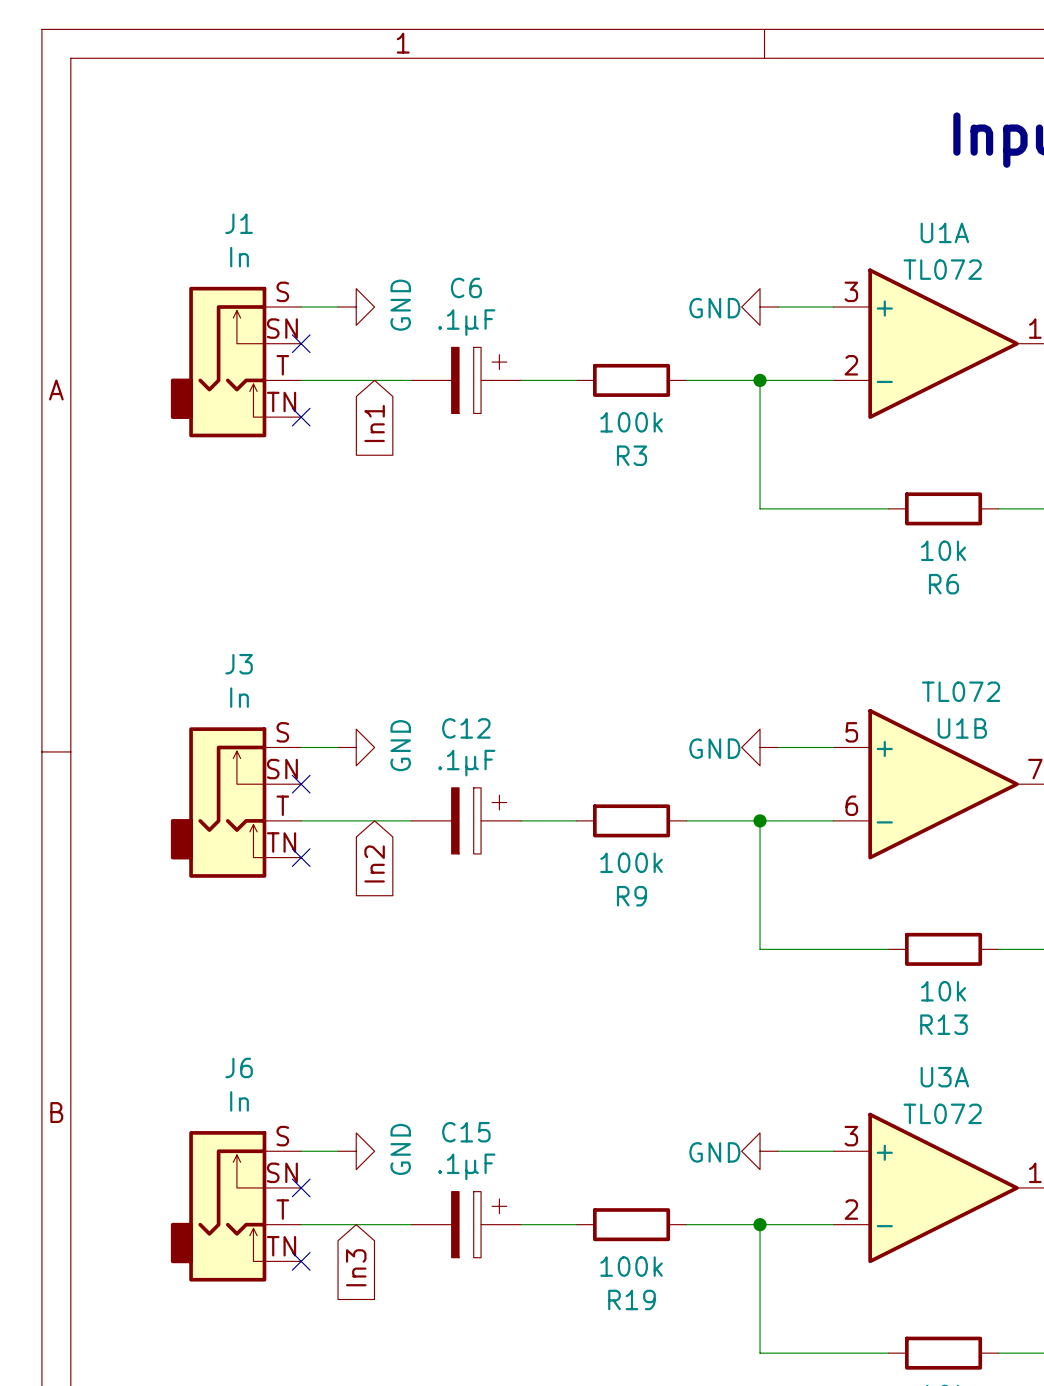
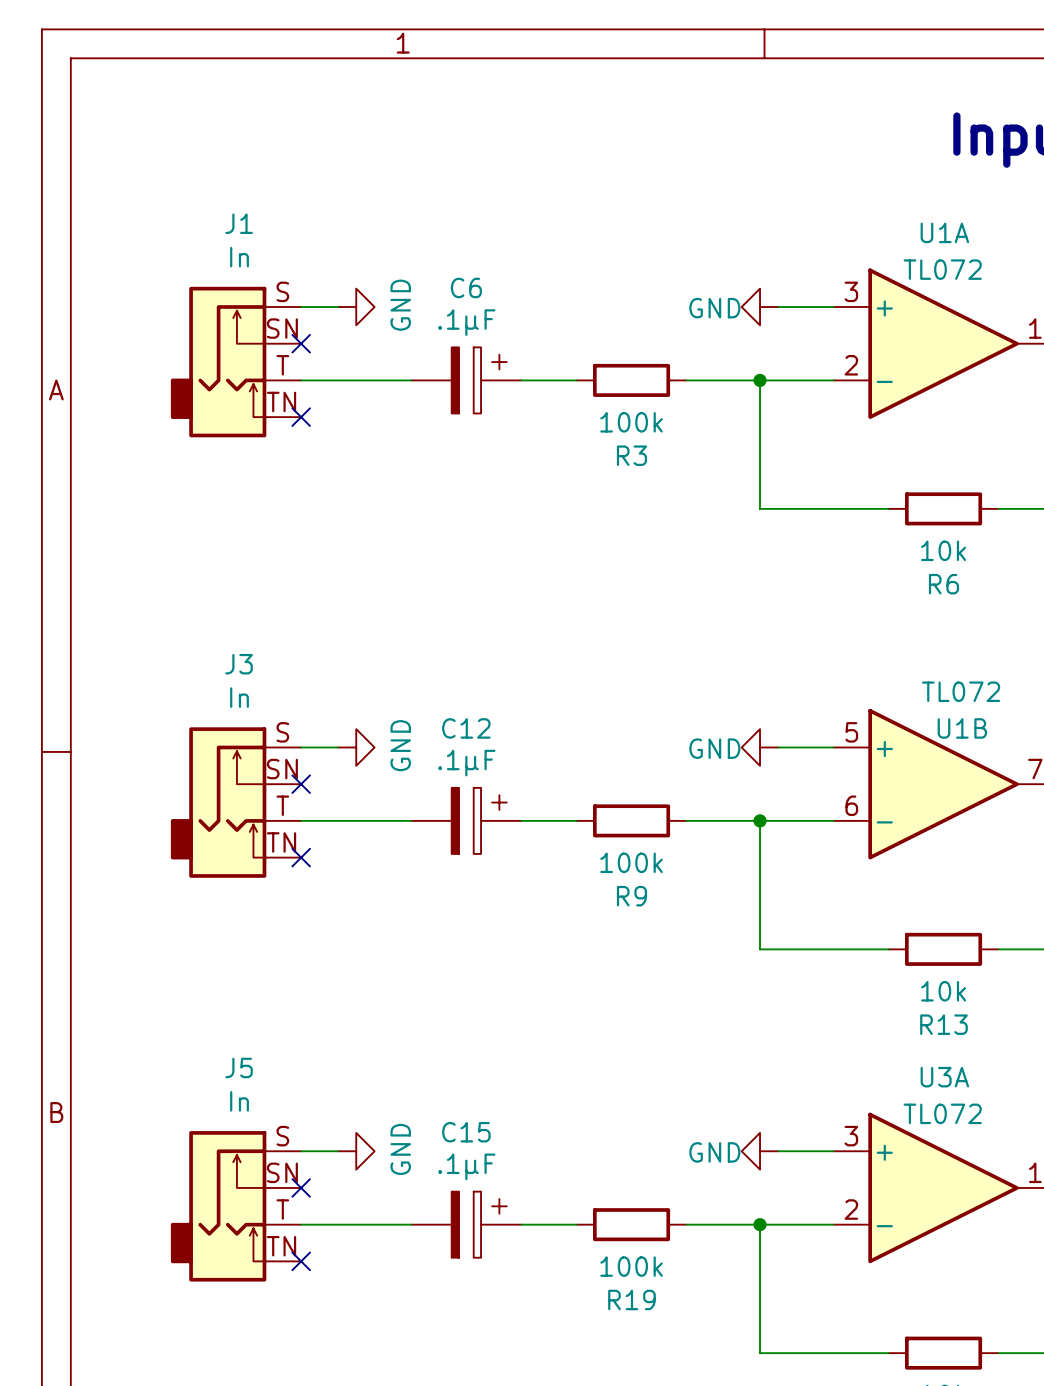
global label: In1 (374, 423) -> none
global label: In2 (374, 863) -> none
J6 name: J6 (239, 1067) -> J5 (239, 1067)
global label: In3 (356, 1267) -> none

